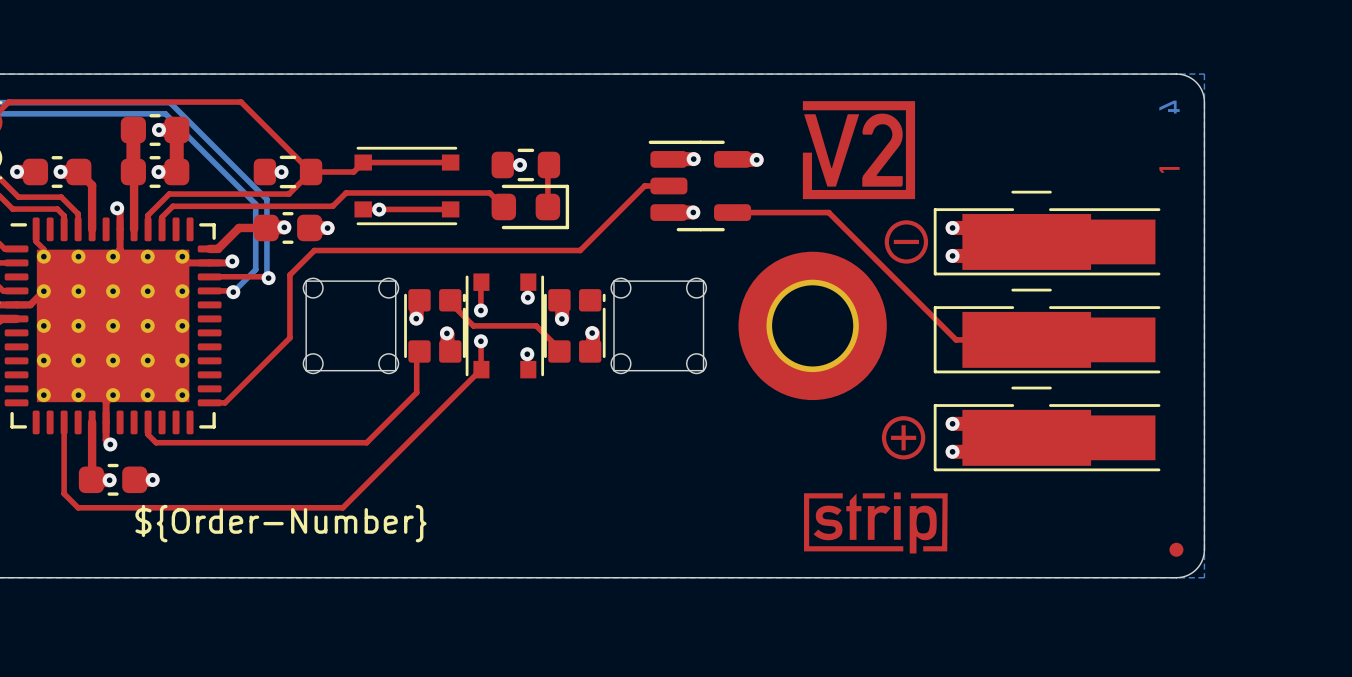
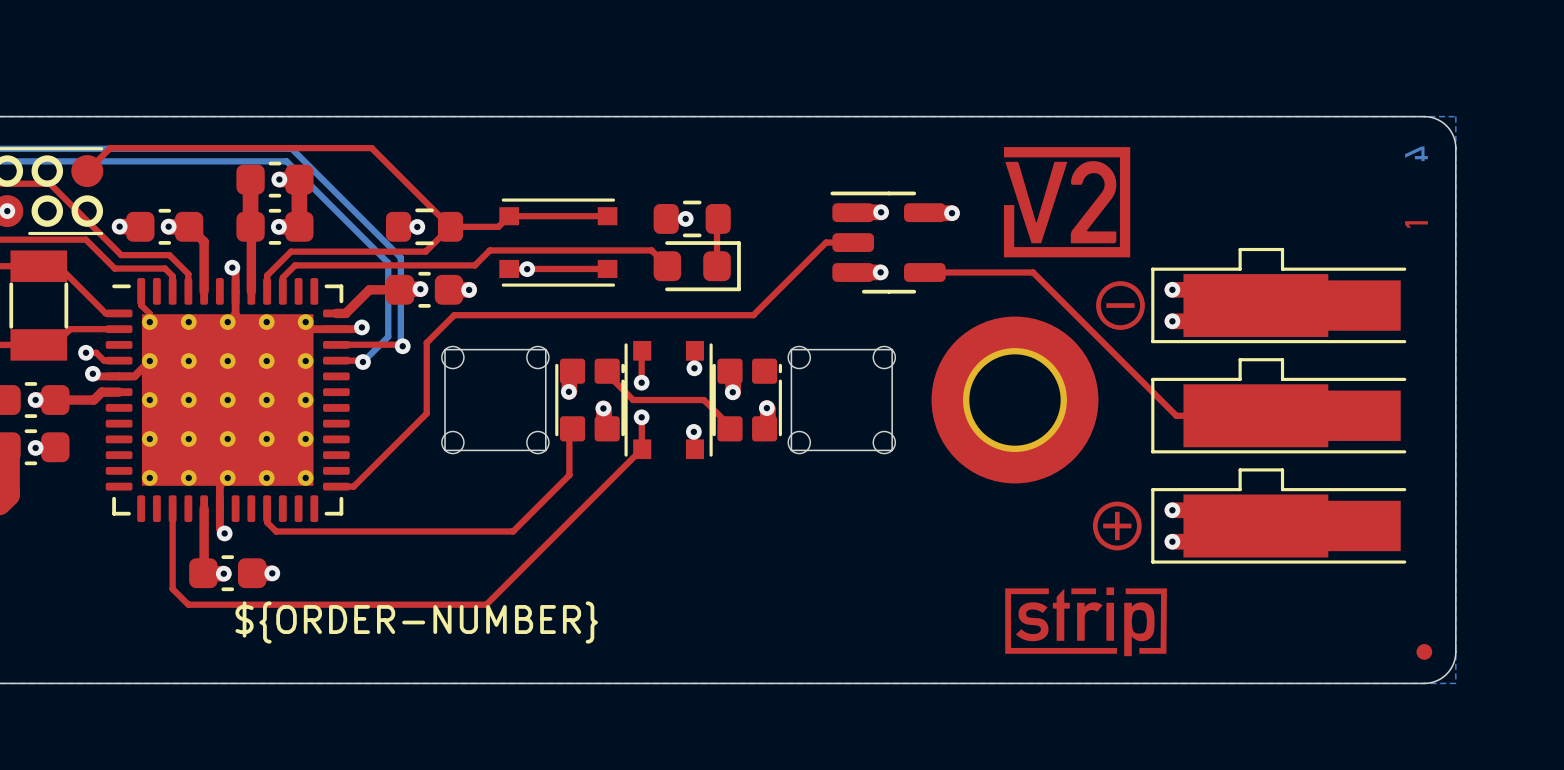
part footprint: [933, 190, 1161, 276] -> [1151, 247, 1407, 344]
part footprint: [933, 288, 1161, 374] -> [1151, 358, 1407, 454]
part footprint: [933, 386, 1161, 472] -> [1151, 468, 1407, 564]
drawing shape: [135, 504, 427, 543] -> [235, 601, 598, 644]

